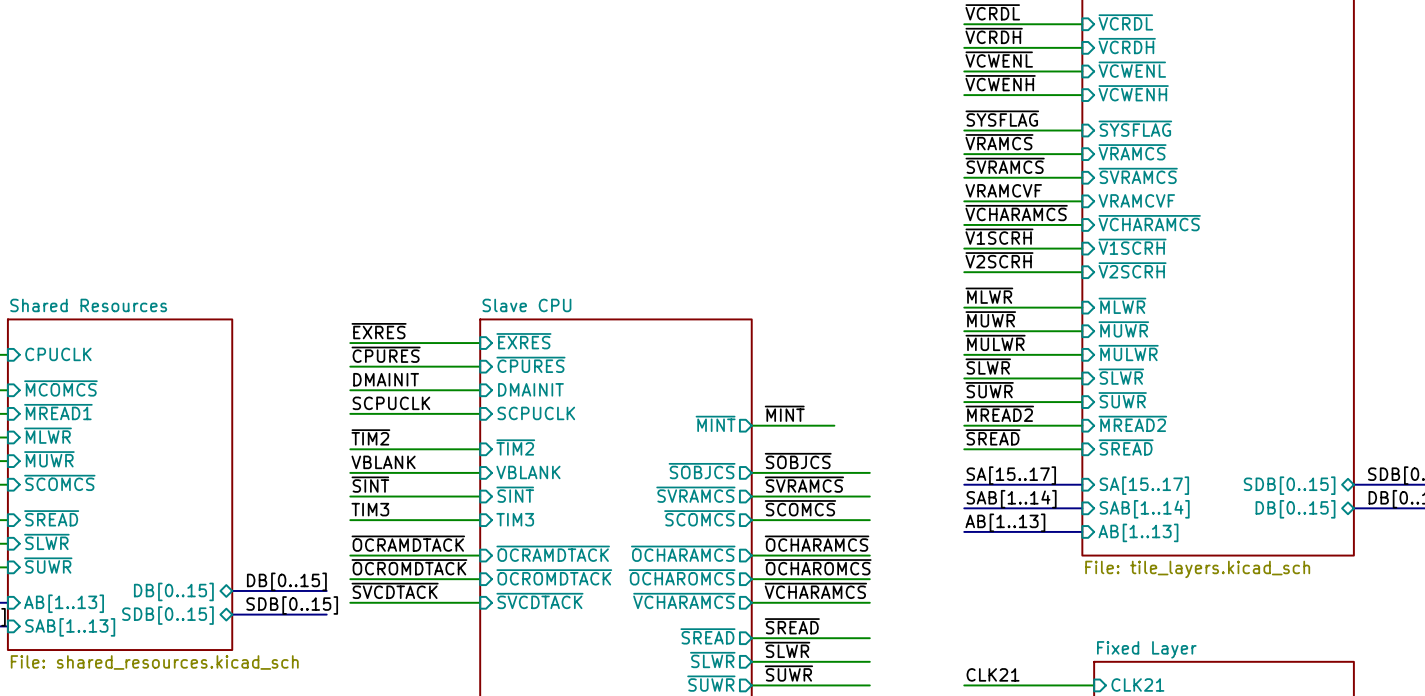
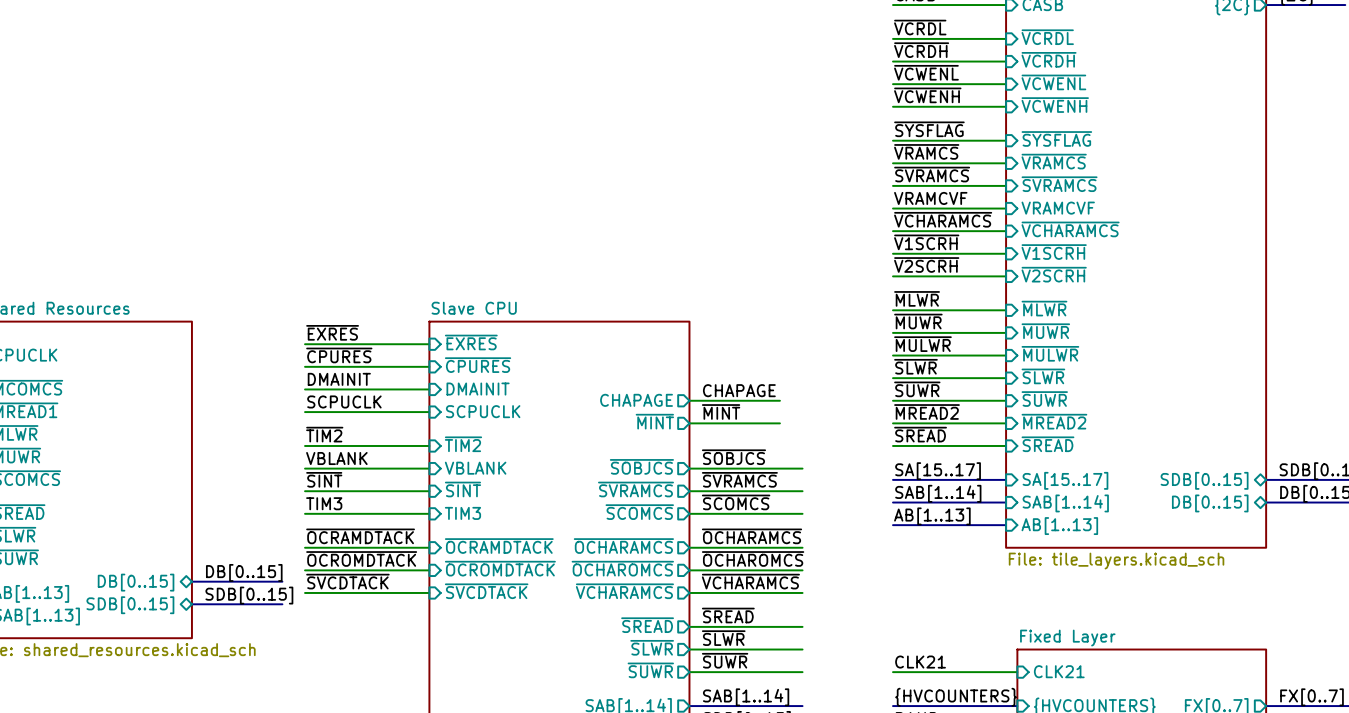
label: none -> CHAPAGE (739, 390)
sheet pin: none -> CHAPAGE (636, 400)
wire: none -> (689, 400) (779, 400)
wire: none -> (768, 423) (779, 423)

